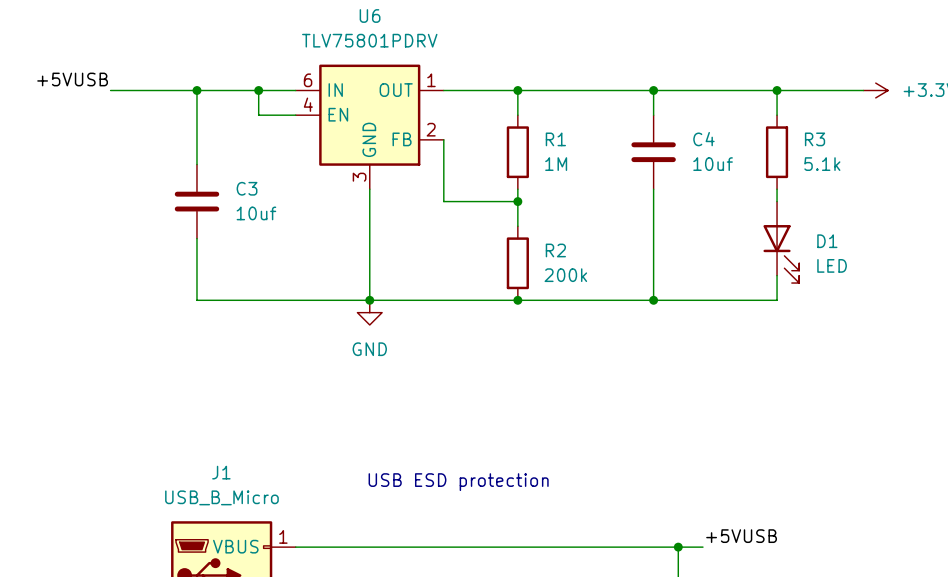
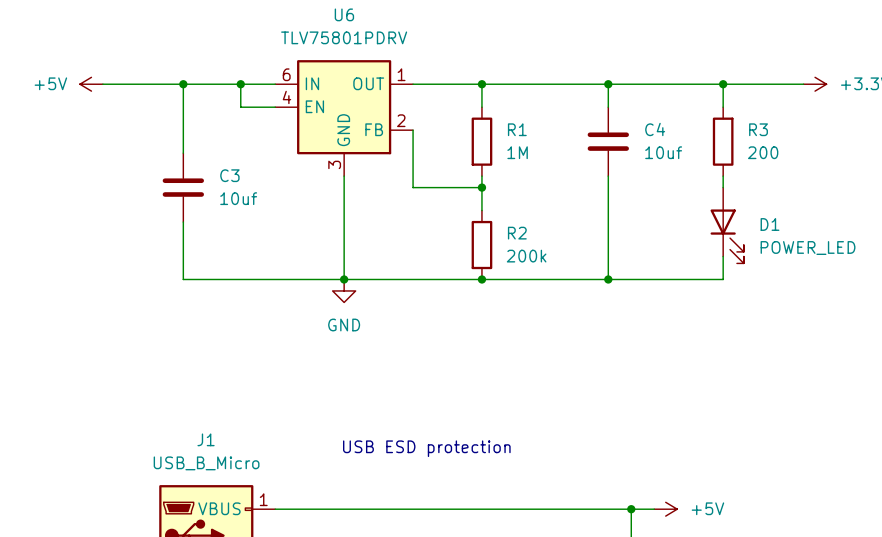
label: +5VUSB (72, 79) -> none
power symbol: none -> +5V (91, 84)
R3 value: 5.1k (822, 164) -> 200 (763, 152)
D1 value: LED (832, 265) -> POWER_LED (808, 248)
label: +5VUSB (741, 536) -> none
power symbol: none -> +5V (665, 509)

